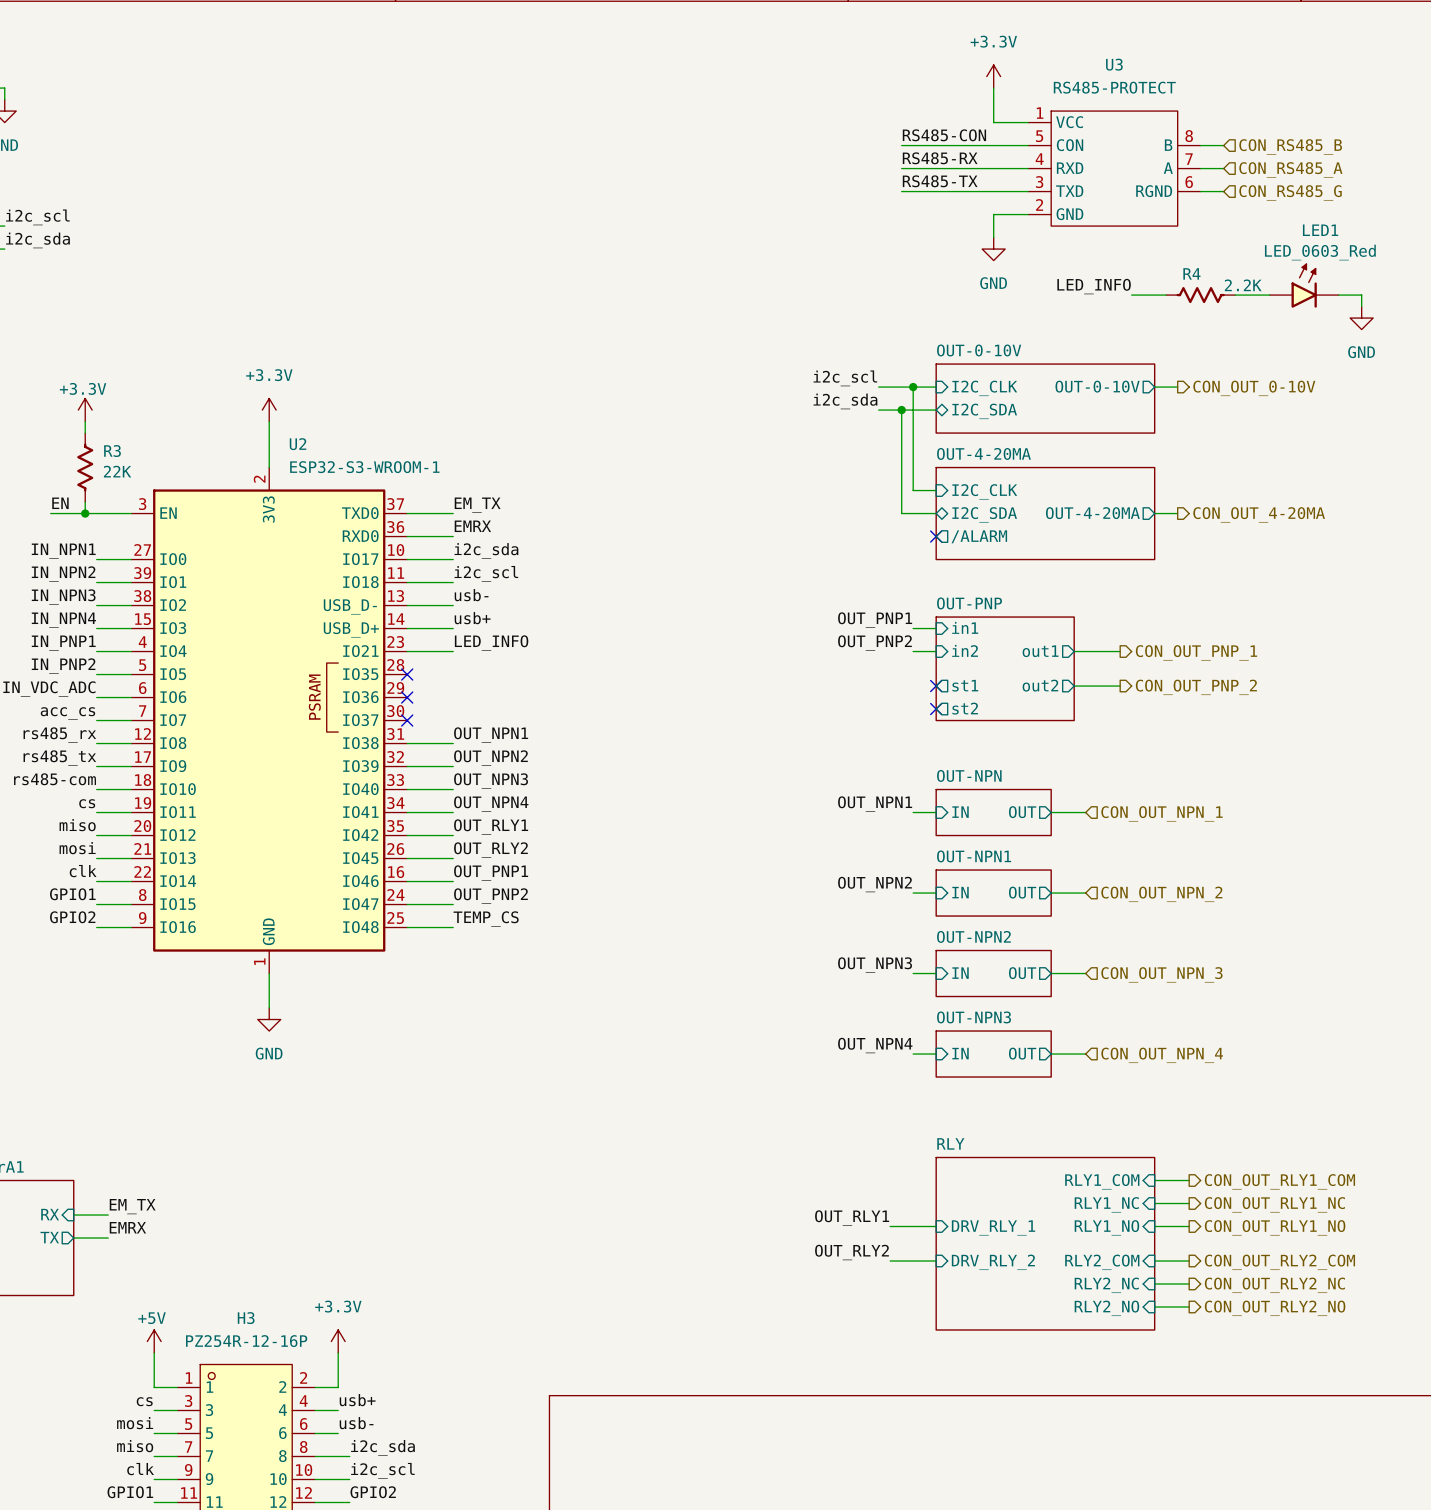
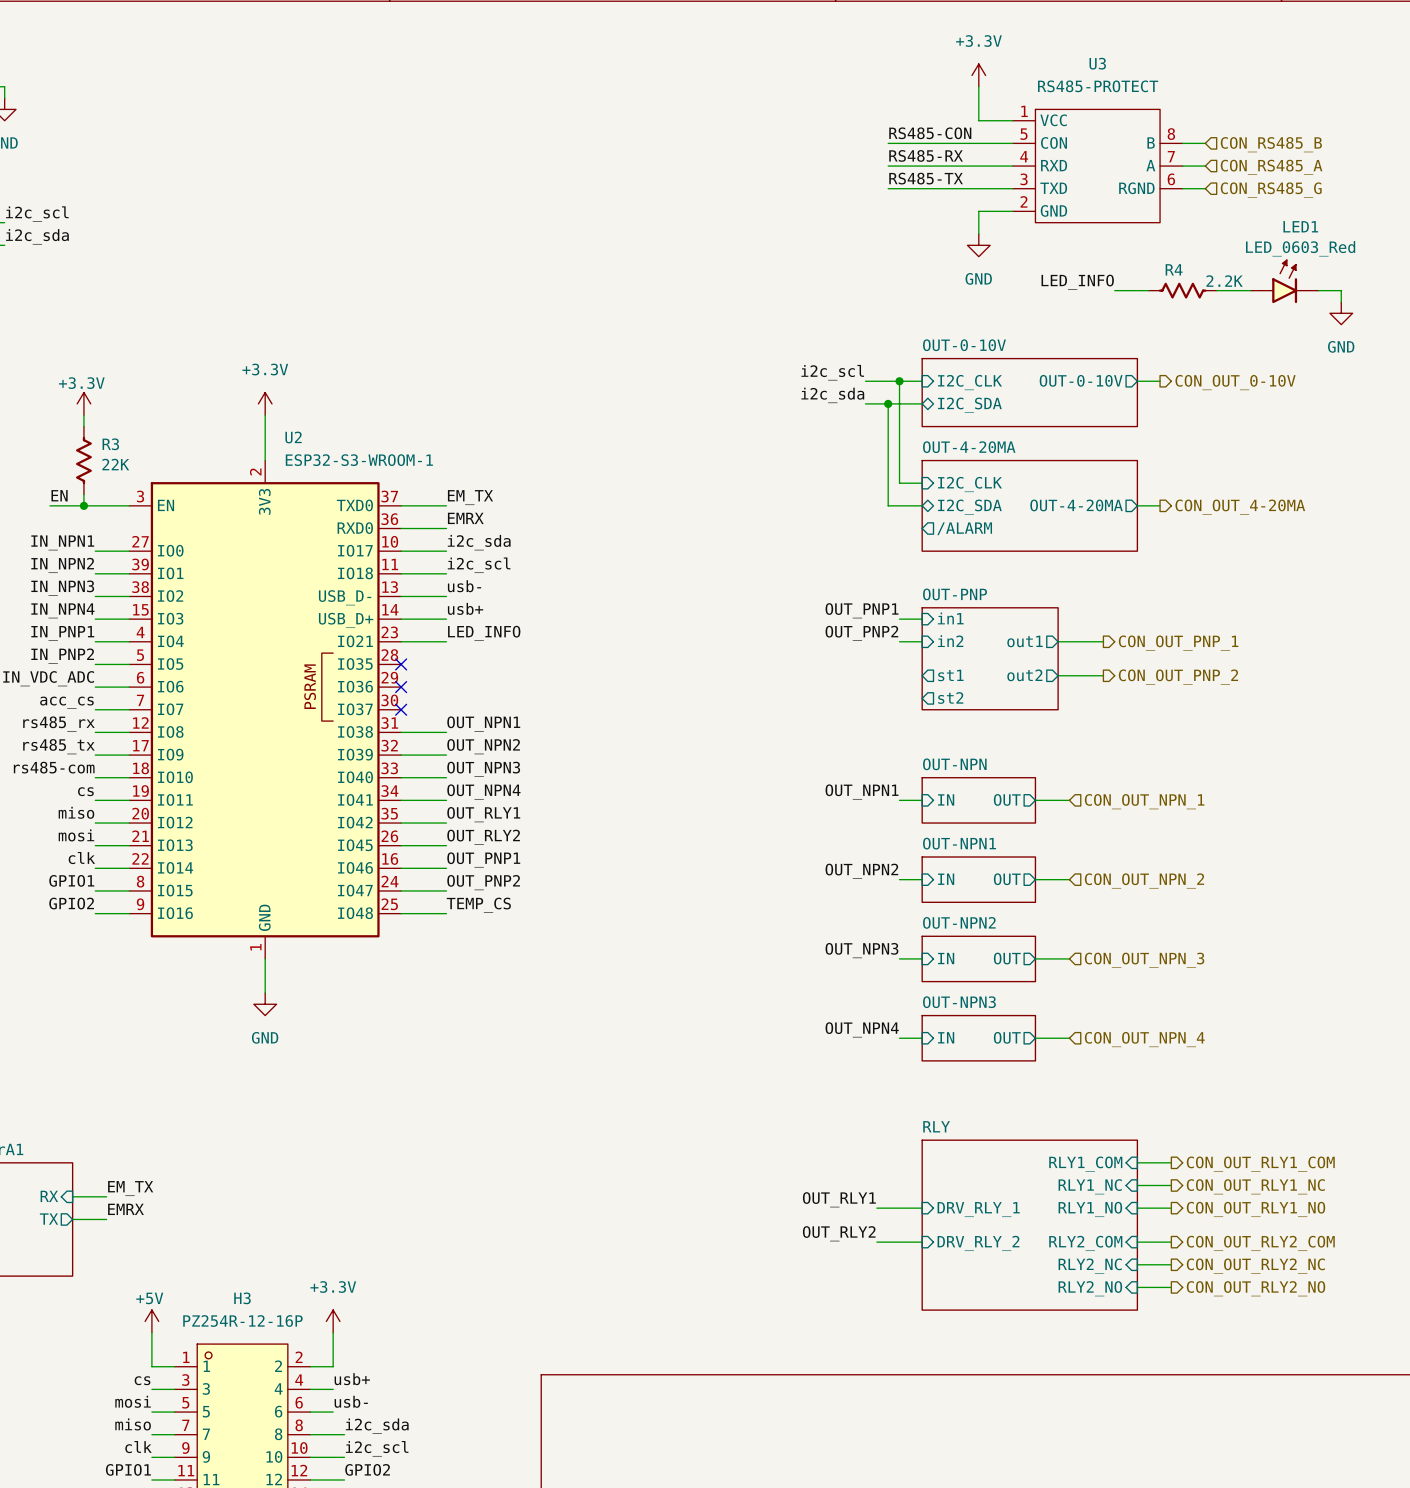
no-connect mark: (936, 536) -> none
no-connect mark: (936, 686) -> none
no-connect mark: (936, 709) -> none

